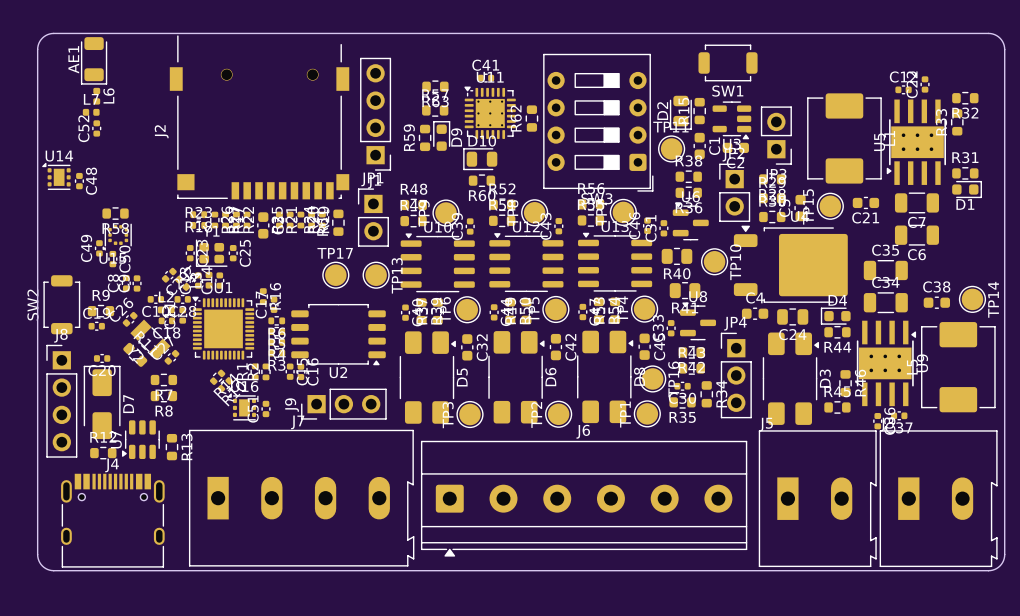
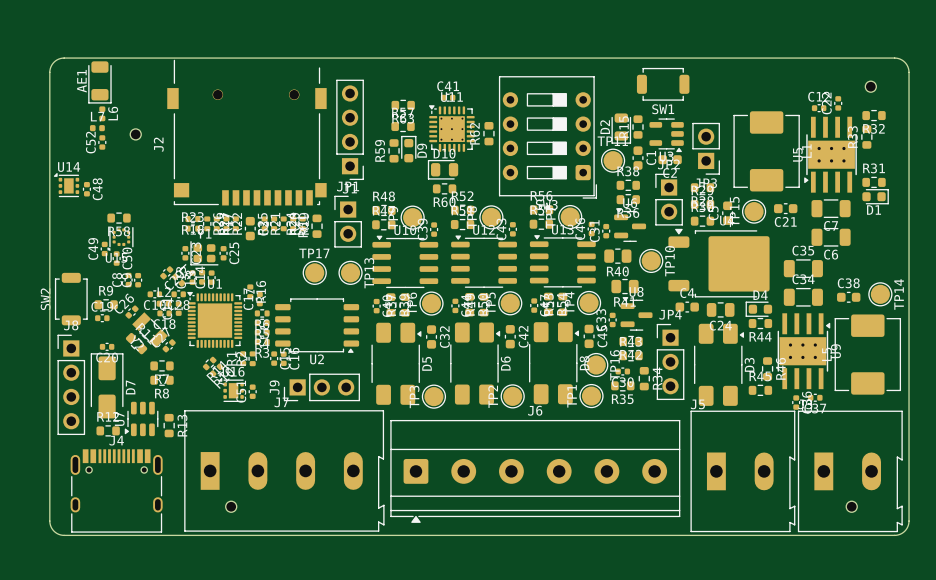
part: none -> (870, 86)
part: none -> (135, 134)
part: none -> (231, 506)
part: none -> (851, 506)

